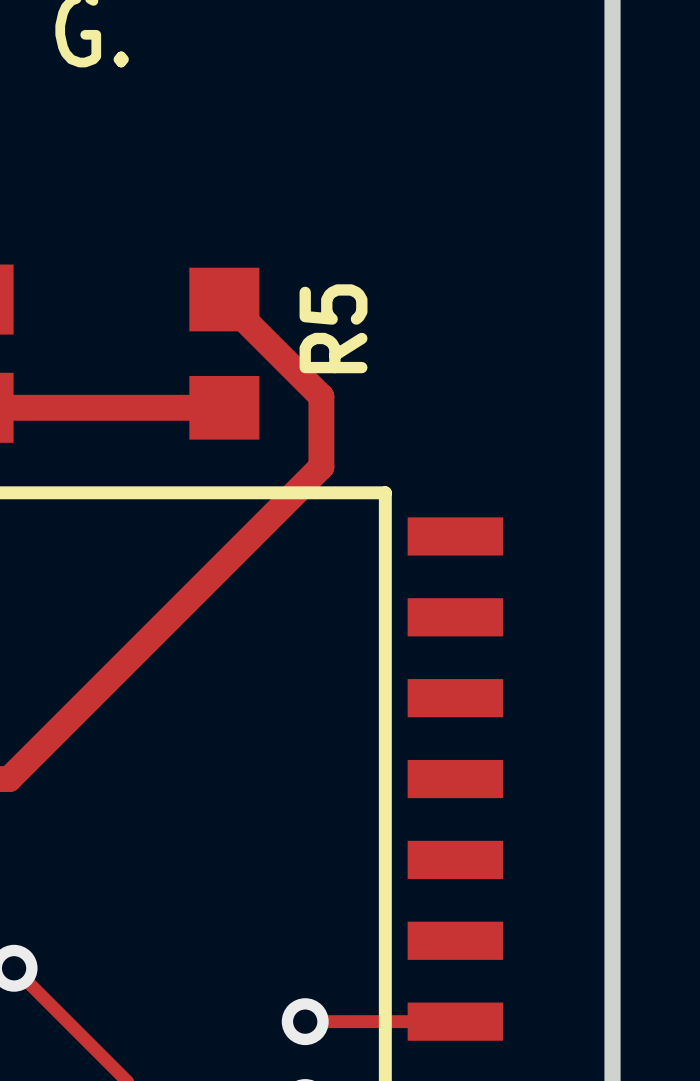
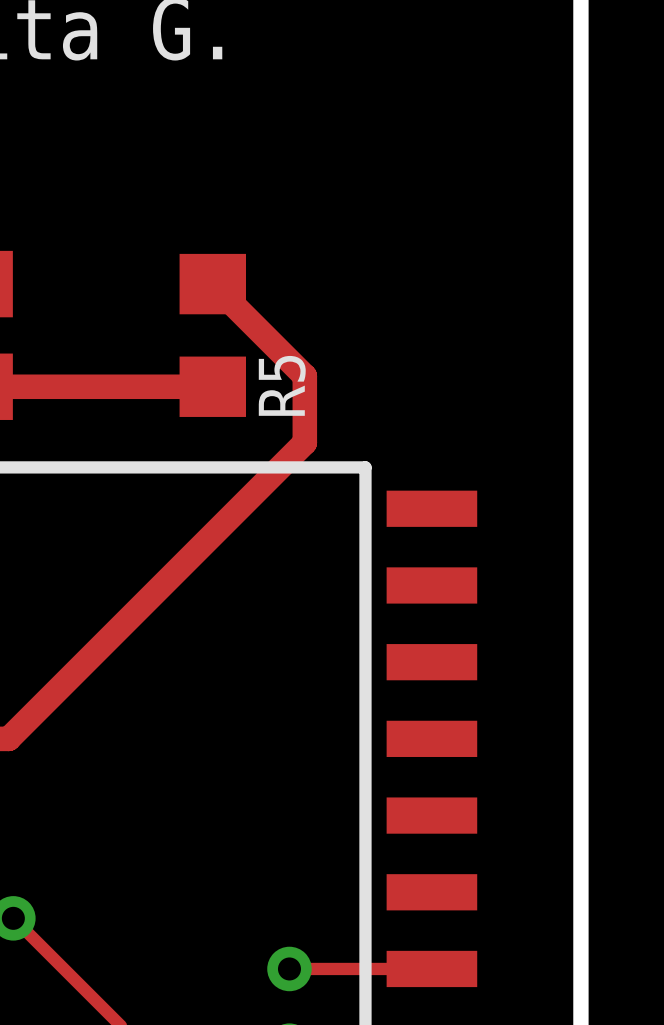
R5 name position: R5 (333, 328) -> R5 (282, 385)

